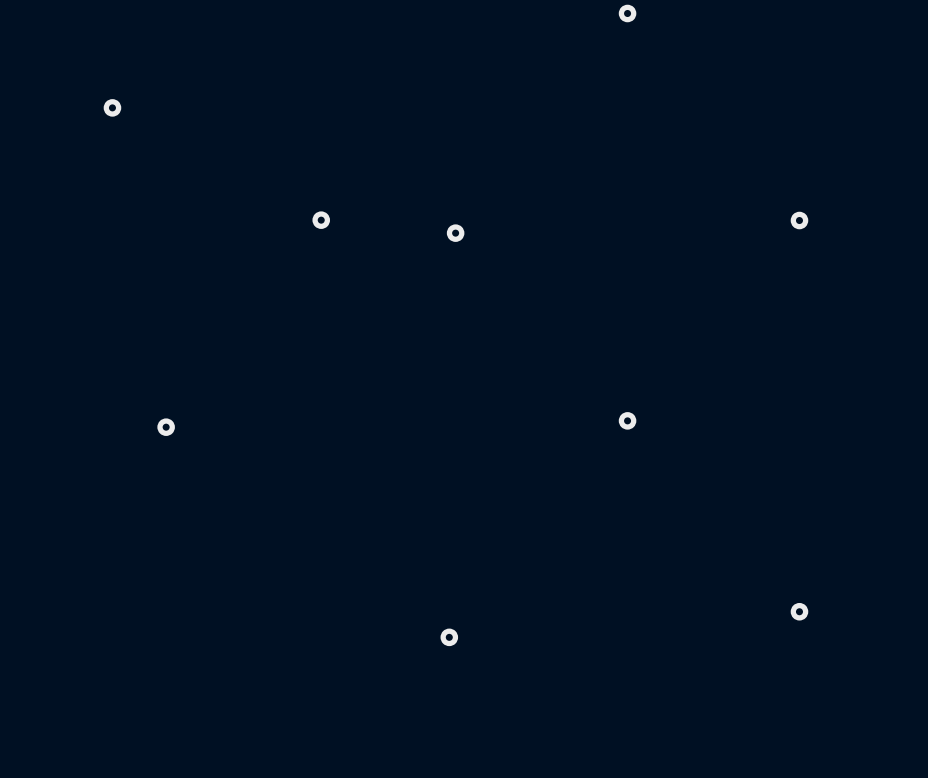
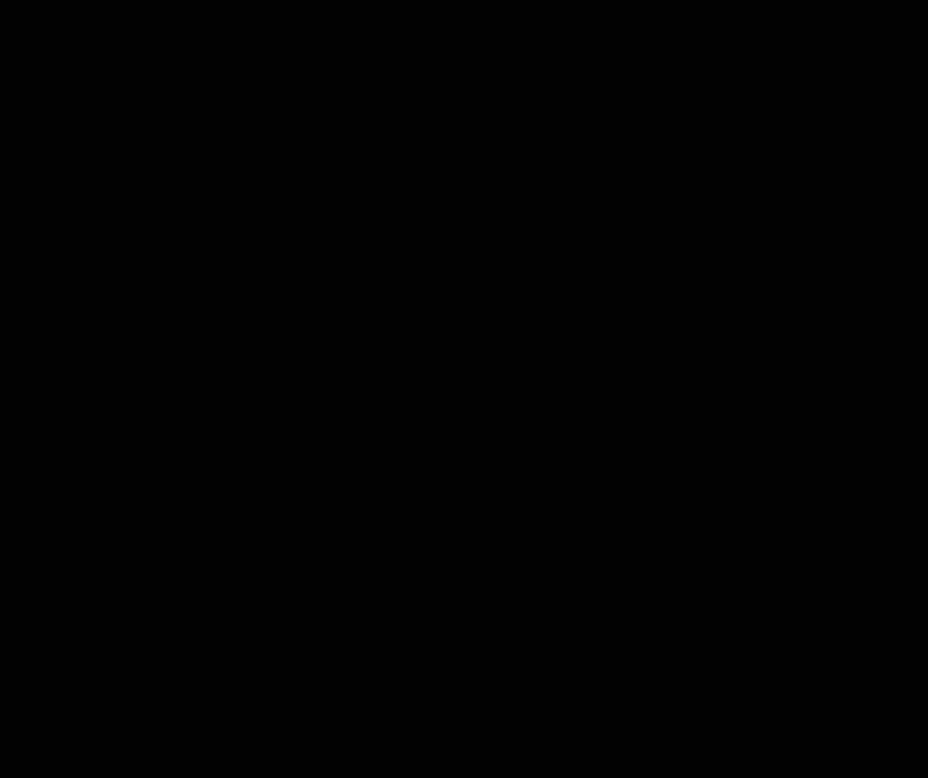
via: (627, 13) -> none
via: (112, 107) -> none
via: (321, 220) -> none
via: (799, 220) -> none
via: (455, 233) -> none
via: (627, 420) -> none
via: (166, 427) -> none
via: (799, 611) -> none
via: (449, 637) -> none

